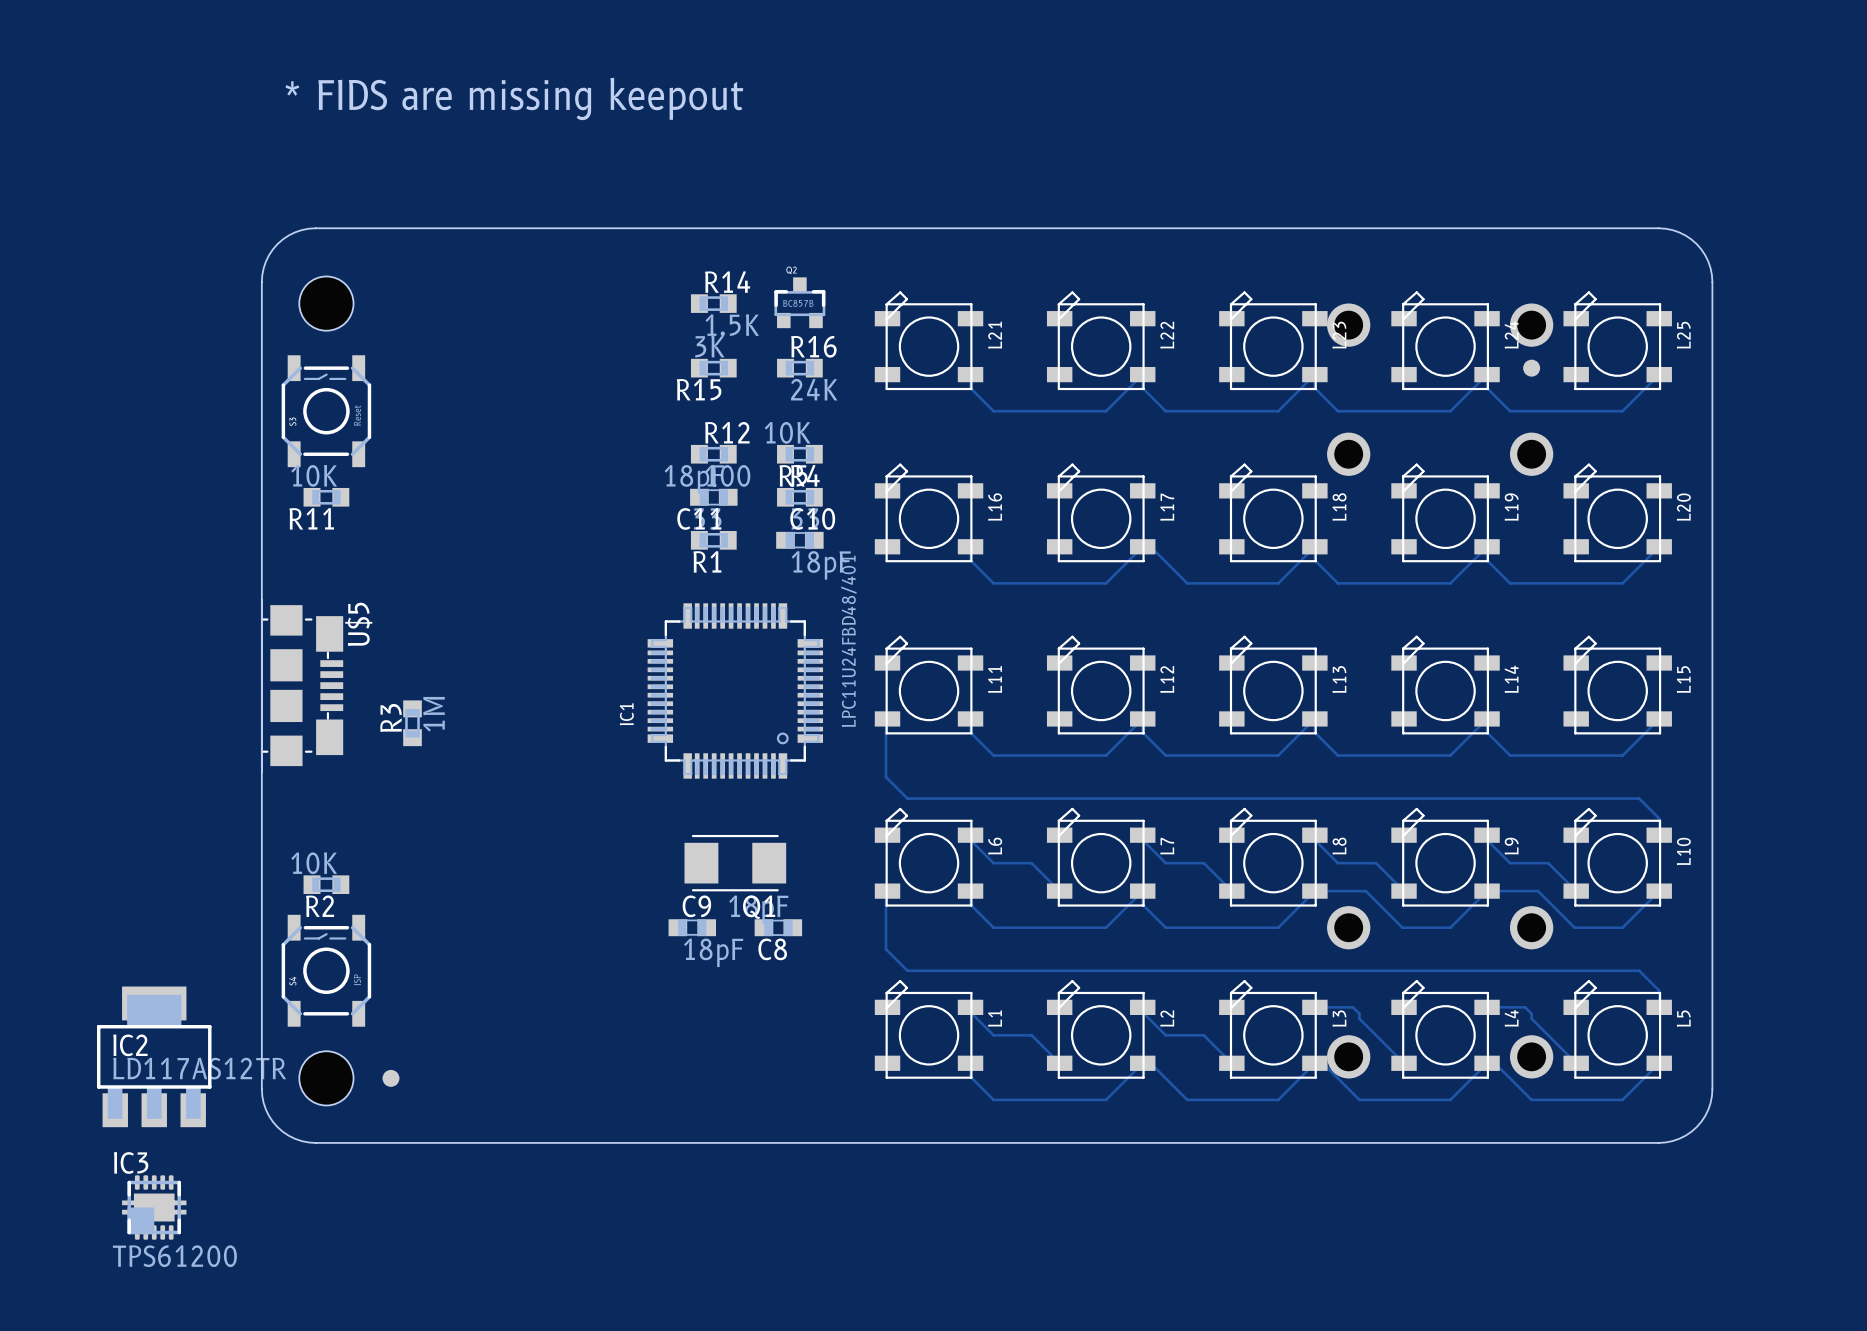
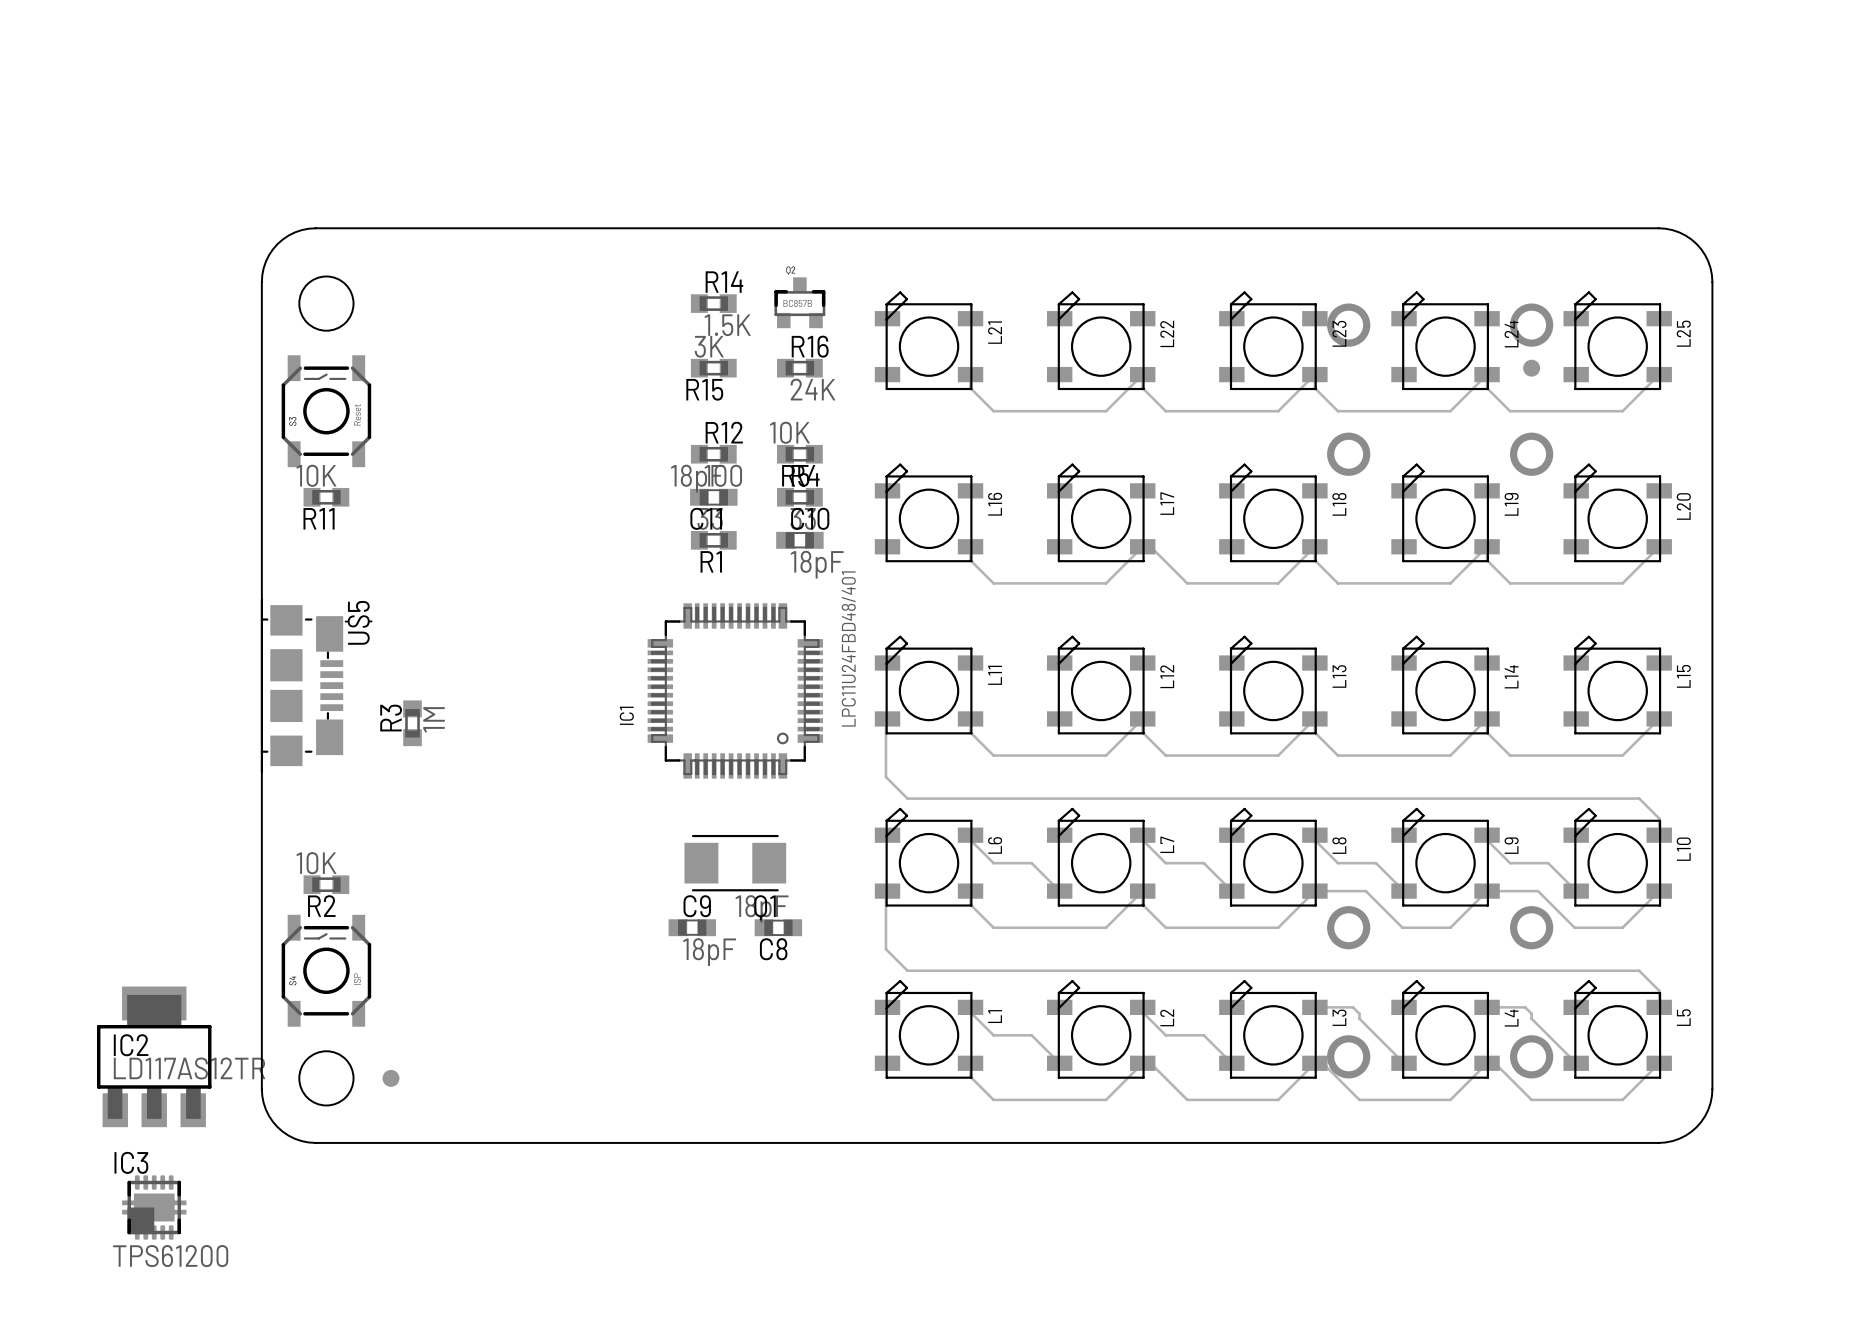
text: * FIDS are missing keepout (514, 98) -> none

